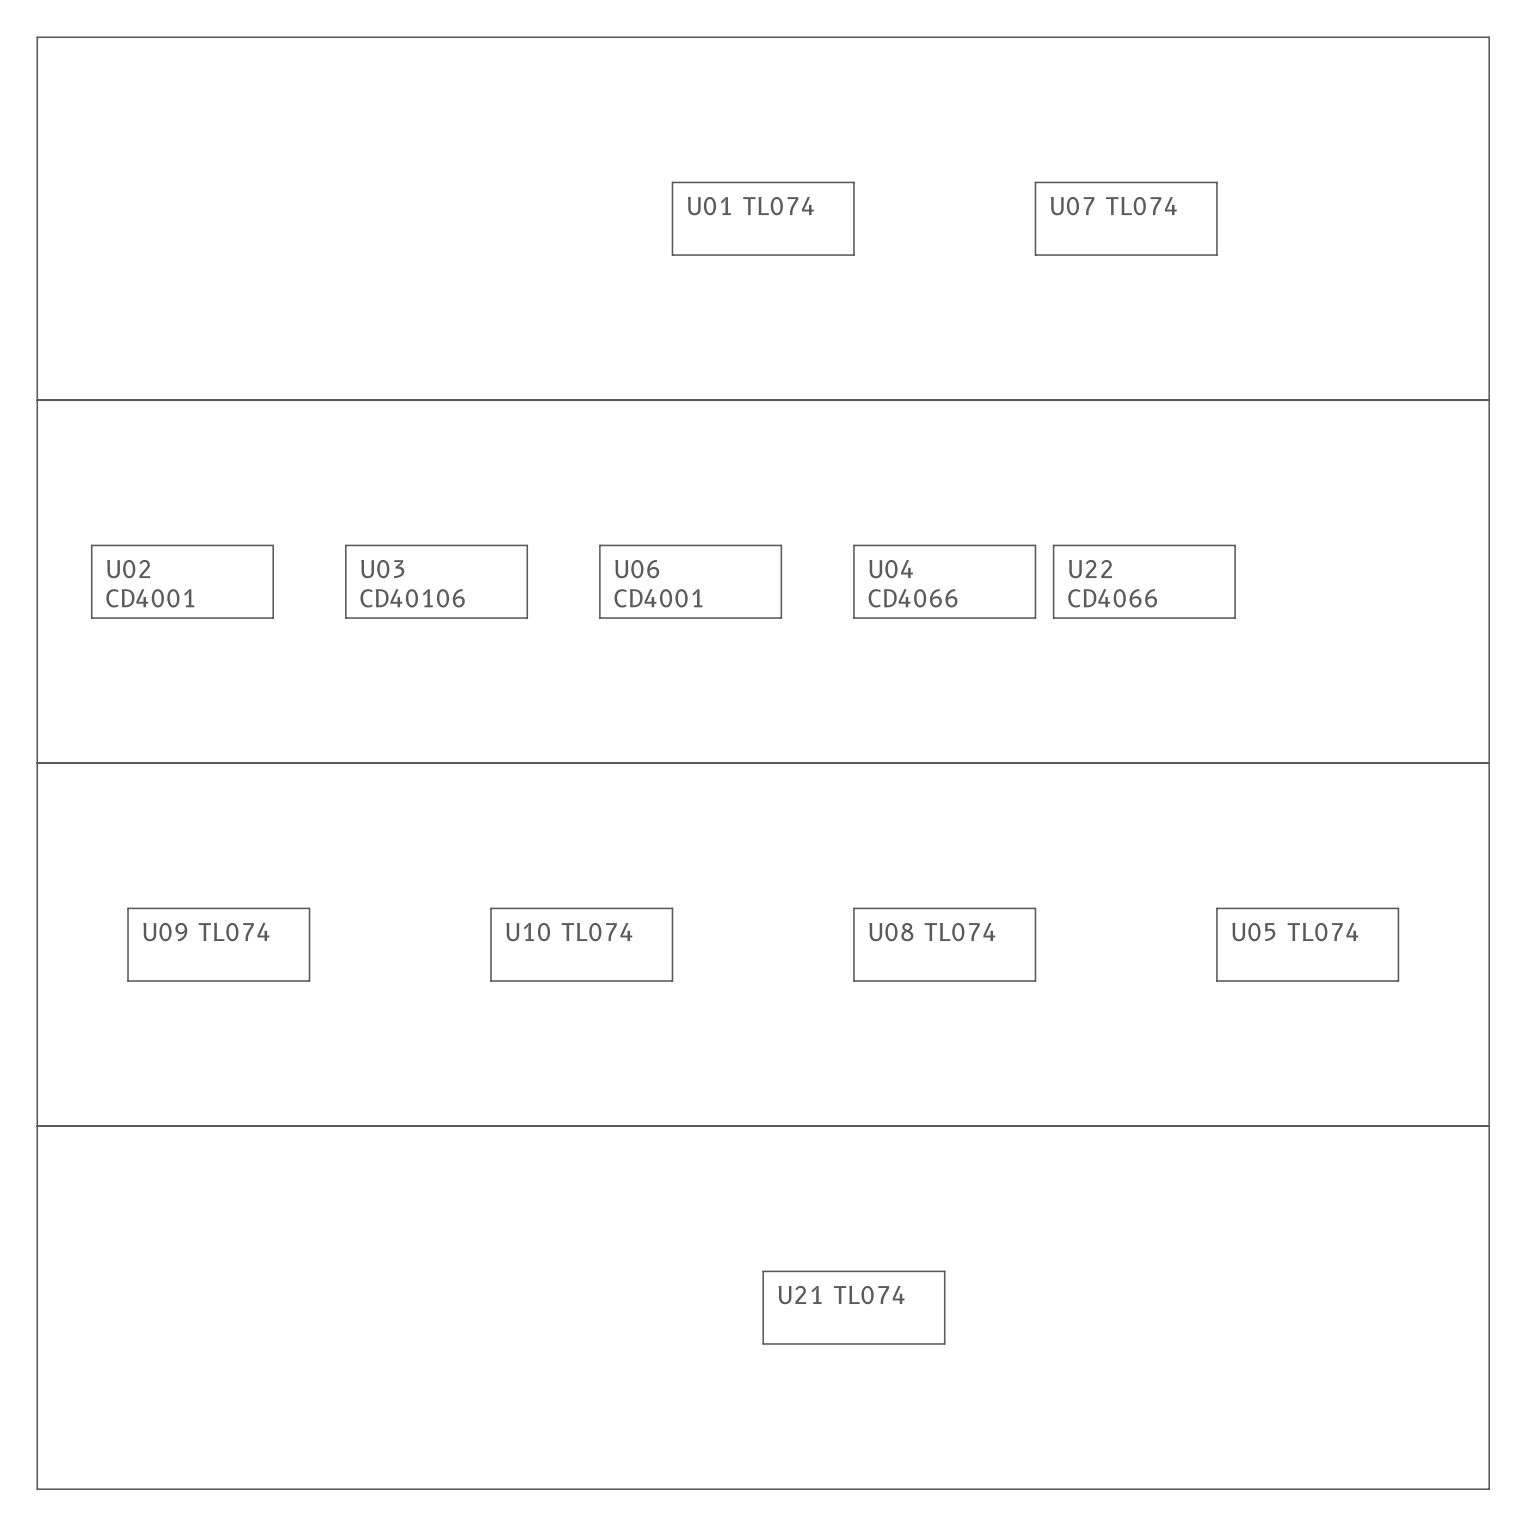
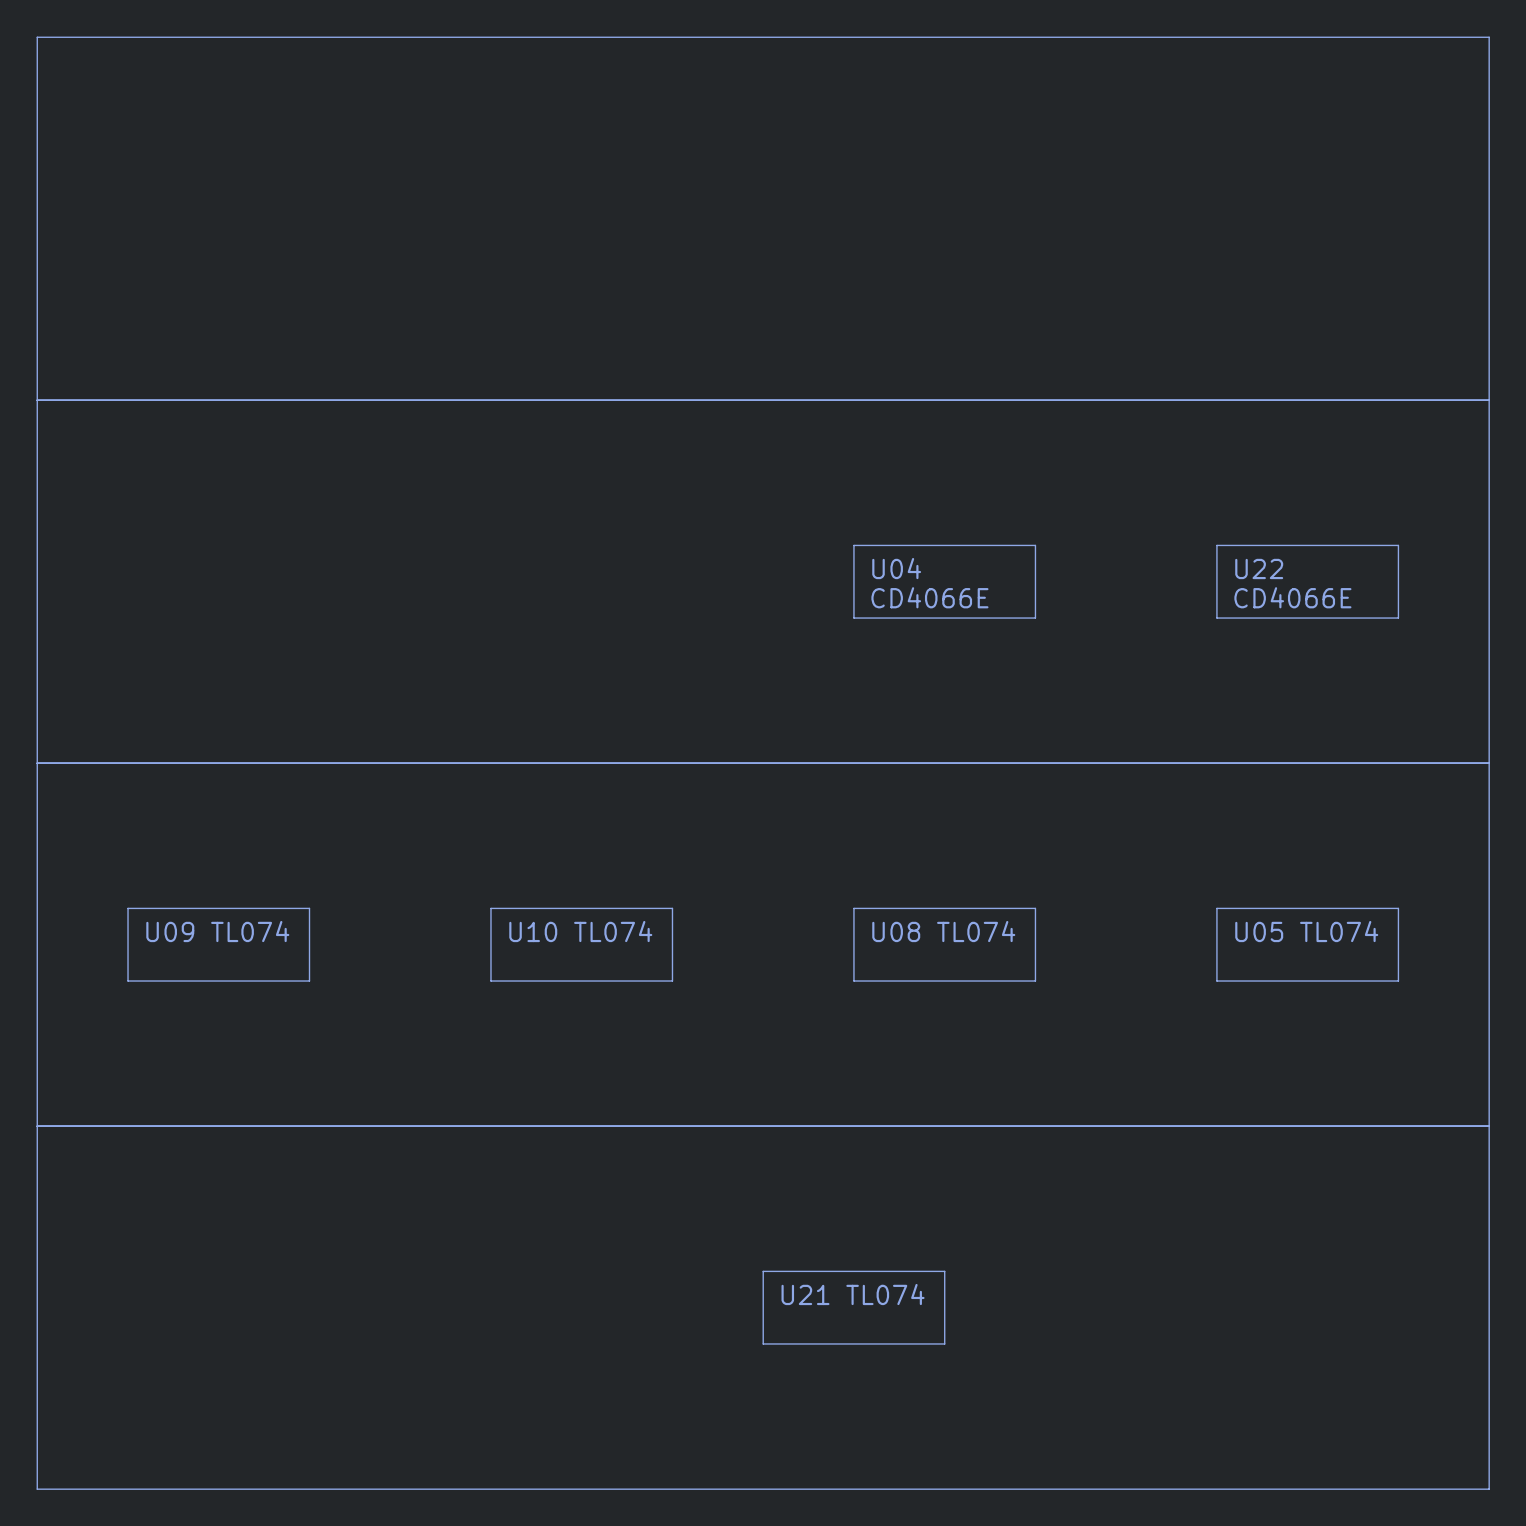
line: (672, 182) (853, 182) (853, 255) (672, 255) (672, 182) -> none
line: (1035, 182) (1216, 182) (1216, 255) (1035, 255) (1035, 182) -> none
text: U01 TL074 (750, 206) -> none
text: U07 TL074 (1113, 206) -> none
line: (91, 545) (273, 545) (273, 618) (91, 618) (91, 545) -> none
line: (345, 545) (527, 545) (527, 618) (345, 618) (345, 545) -> none
line: (599, 545) (781, 545) (781, 618) (599, 618) (599, 545) -> none
line: (1216, 545) (1053, 545) (1053, 618) (1216, 618) -> (1216, 545) (1216, 618)
line: (1235, 545) (1235, 618) -> (1235, 545) (1398, 545) (1398, 618) (1235, 618)
text: U02 (128, 569) -> none
text: U03 (382, 569) -> none
text: U06 (637, 569) -> none
text position: U22 (1090, 569) -> U22 (1259, 568)
text: CD4001 (150, 598) -> none
text: CD40106 (412, 598) -> none
text: CD4001 (658, 598) -> none
text: CD4066 (913, 598) -> CD4066E (929, 597)
text: CD4066 (1112, 598) -> none
text: none -> CD4066E (1292, 597)

